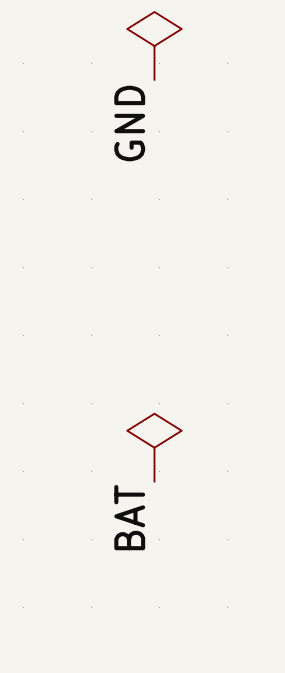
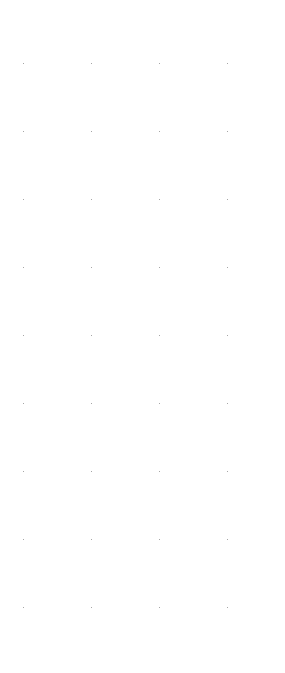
power symbol: (154, 46) -> none
label: GND (129, 123) -> none
power symbol: (154, 447) -> none
label: BAT (129, 517) -> none

